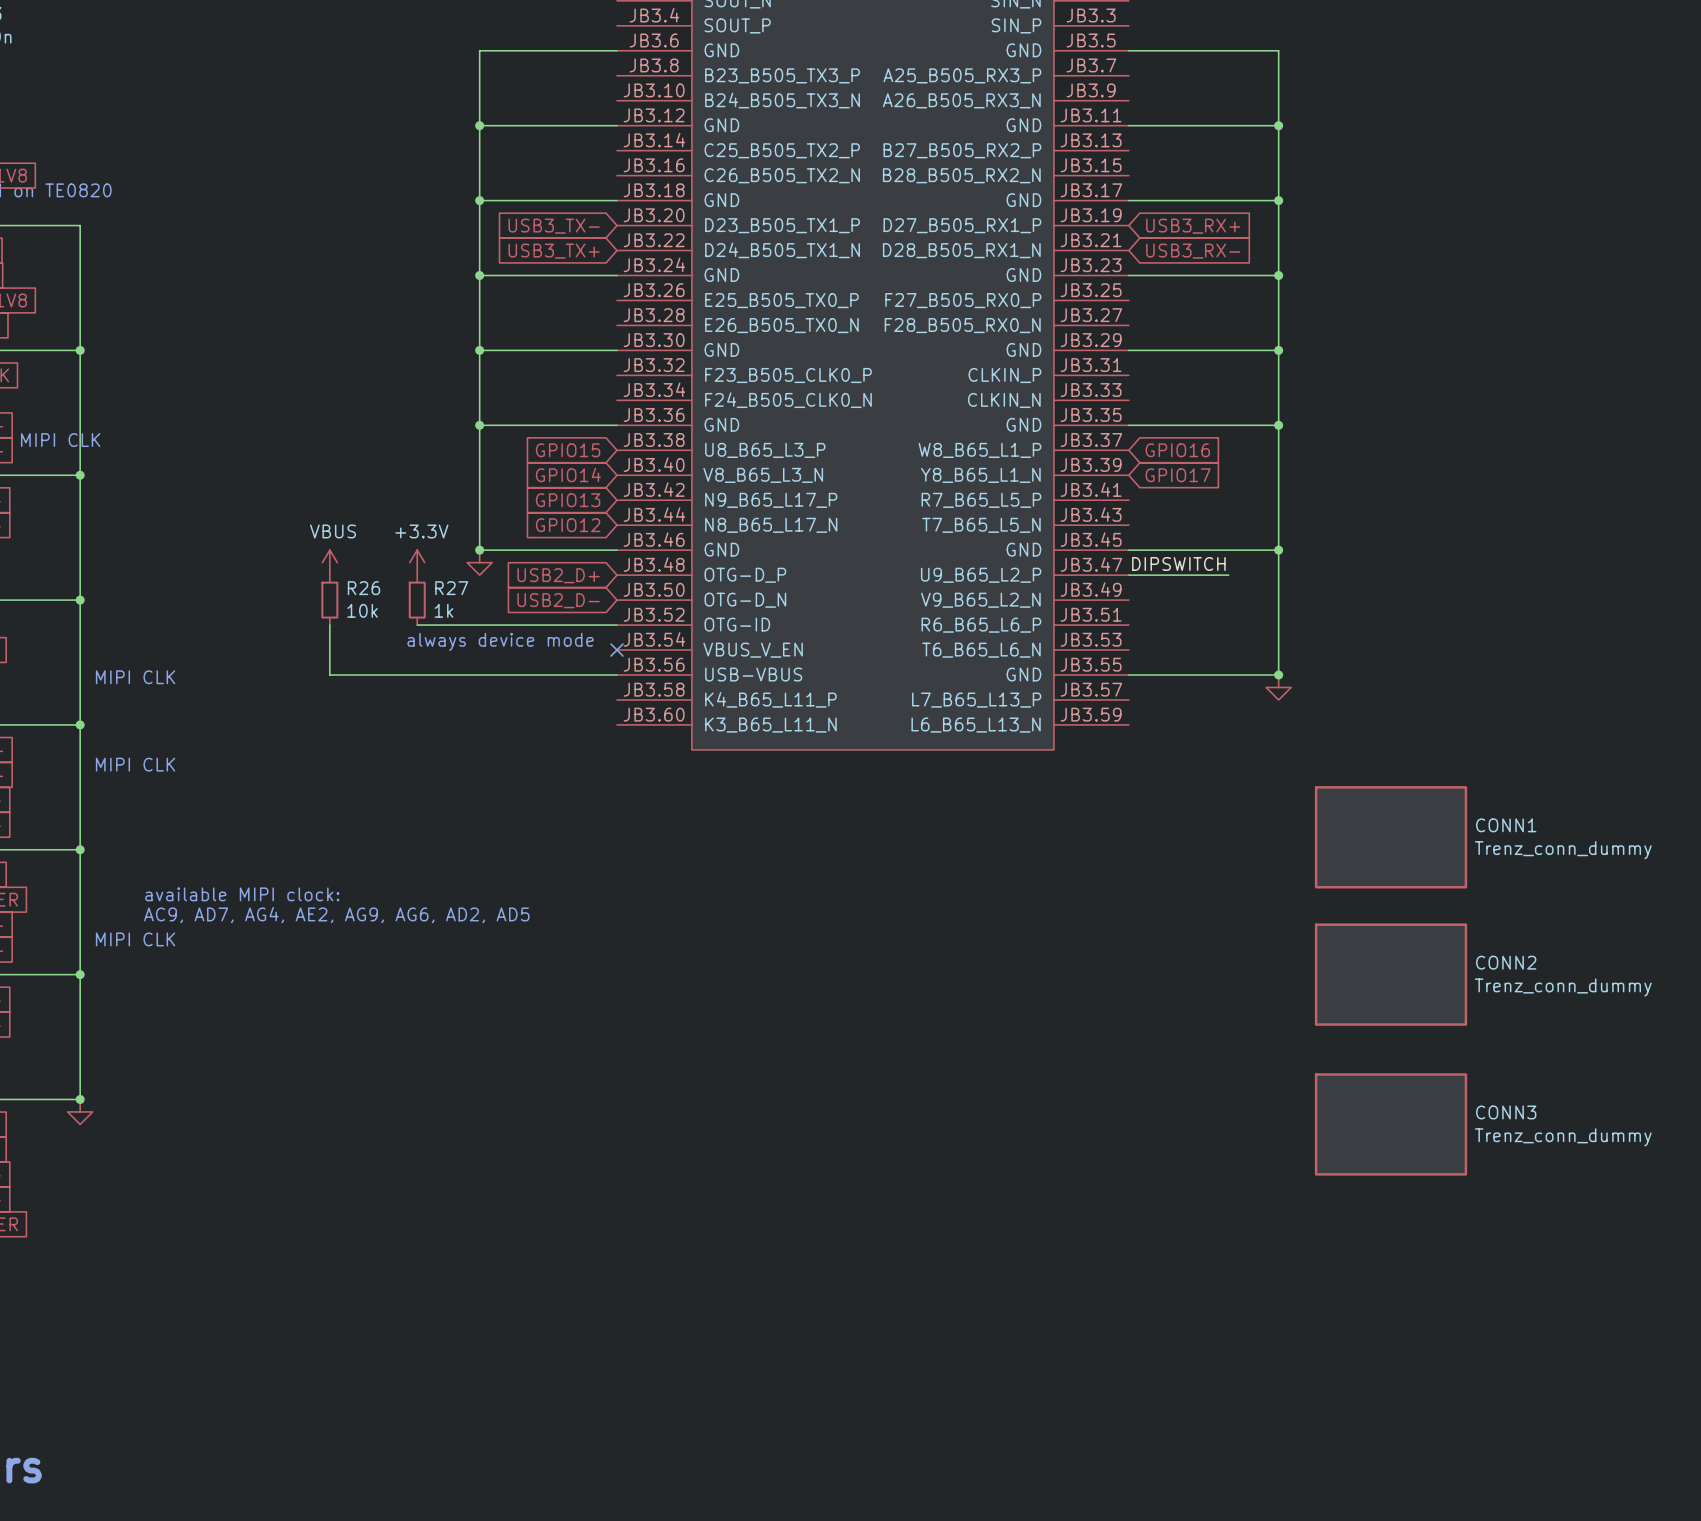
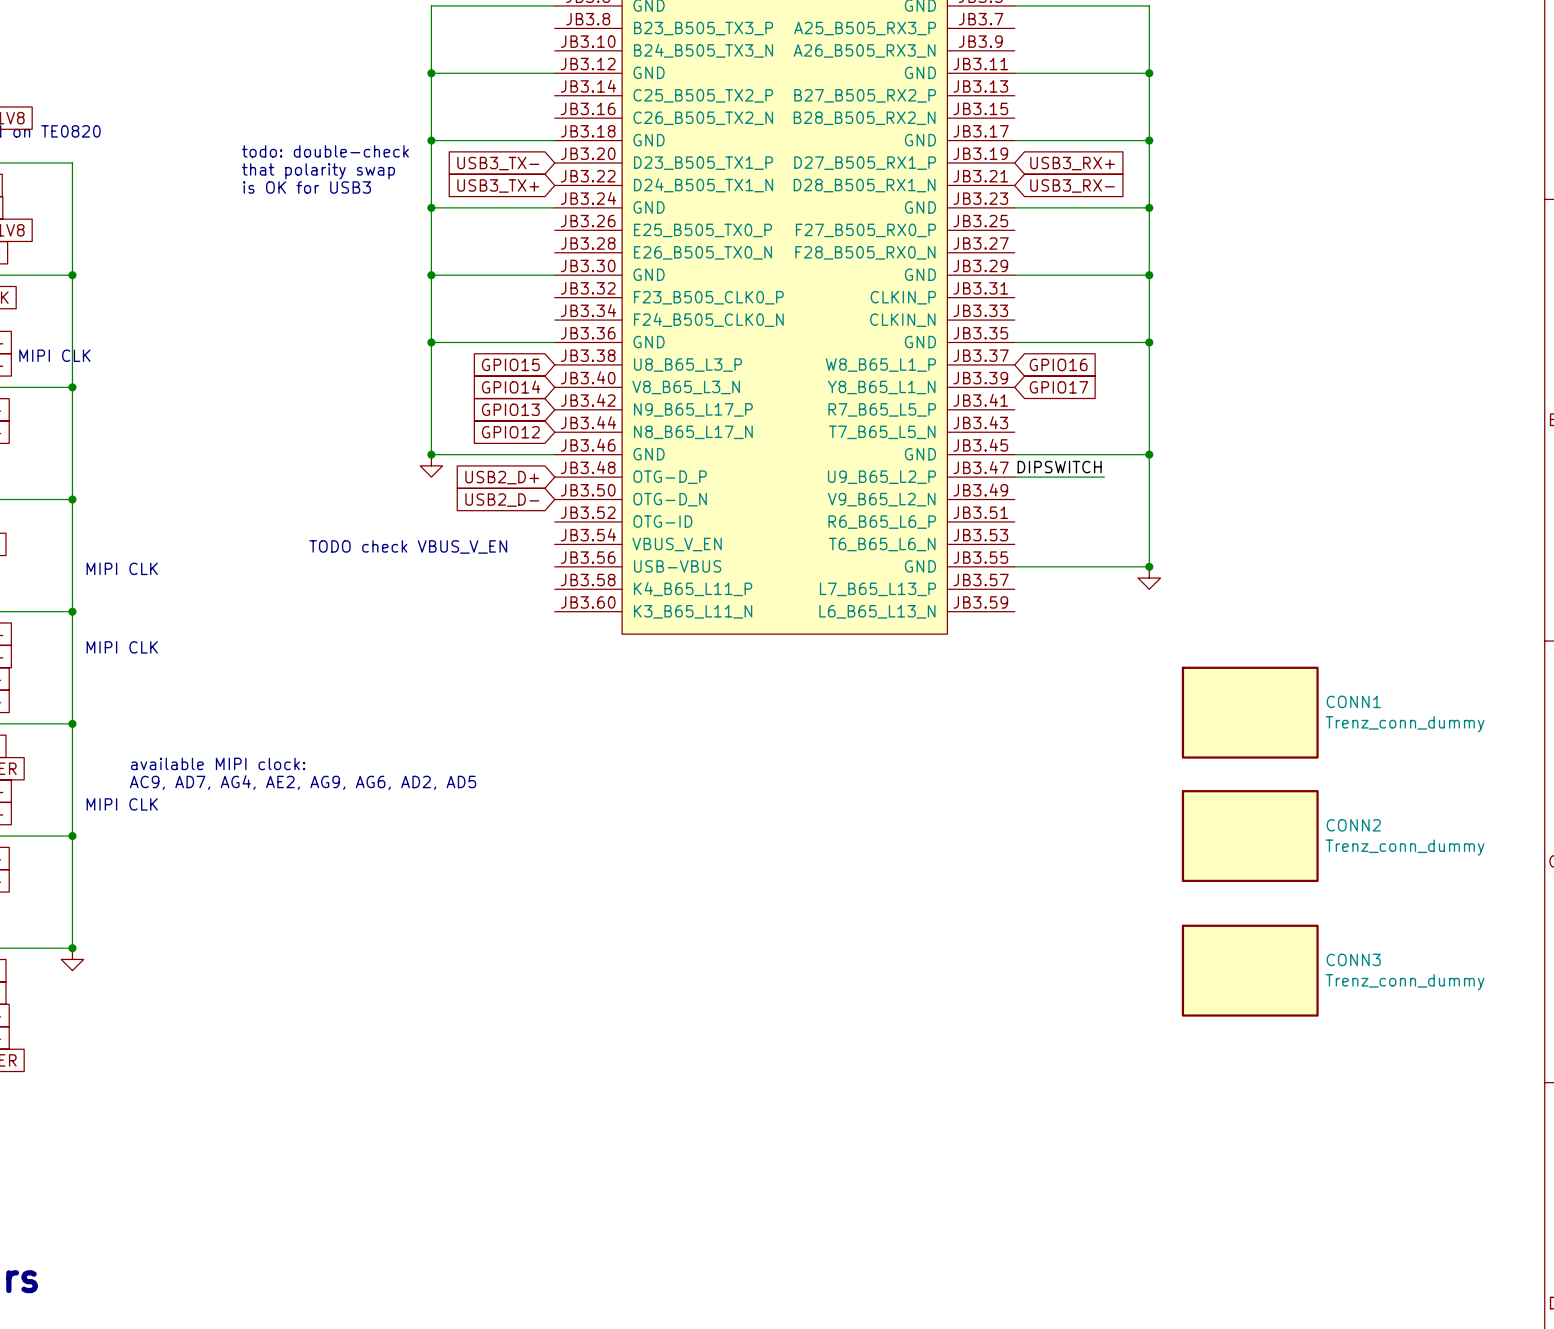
text: none -> todo: double-check (325, 151)
text: none -> that polarity swap (318, 171)
text: none -> is OK for USB3 (307, 187)
power symbol: VBUS (329, 562) -> none
power symbol: +3.3V (417, 562) -> none
R26: 10k (329, 600) -> none
R27: 1k (417, 600) -> none
wire: (329, 625) (329, 675) (616, 675) -> none
wire: (417, 625) (616, 625) -> none
text: always device mode (500, 641) -> none
no-connect mark: (616, 650) -> none
text: none -> TODO check VBUS_V_EN (408, 546)

